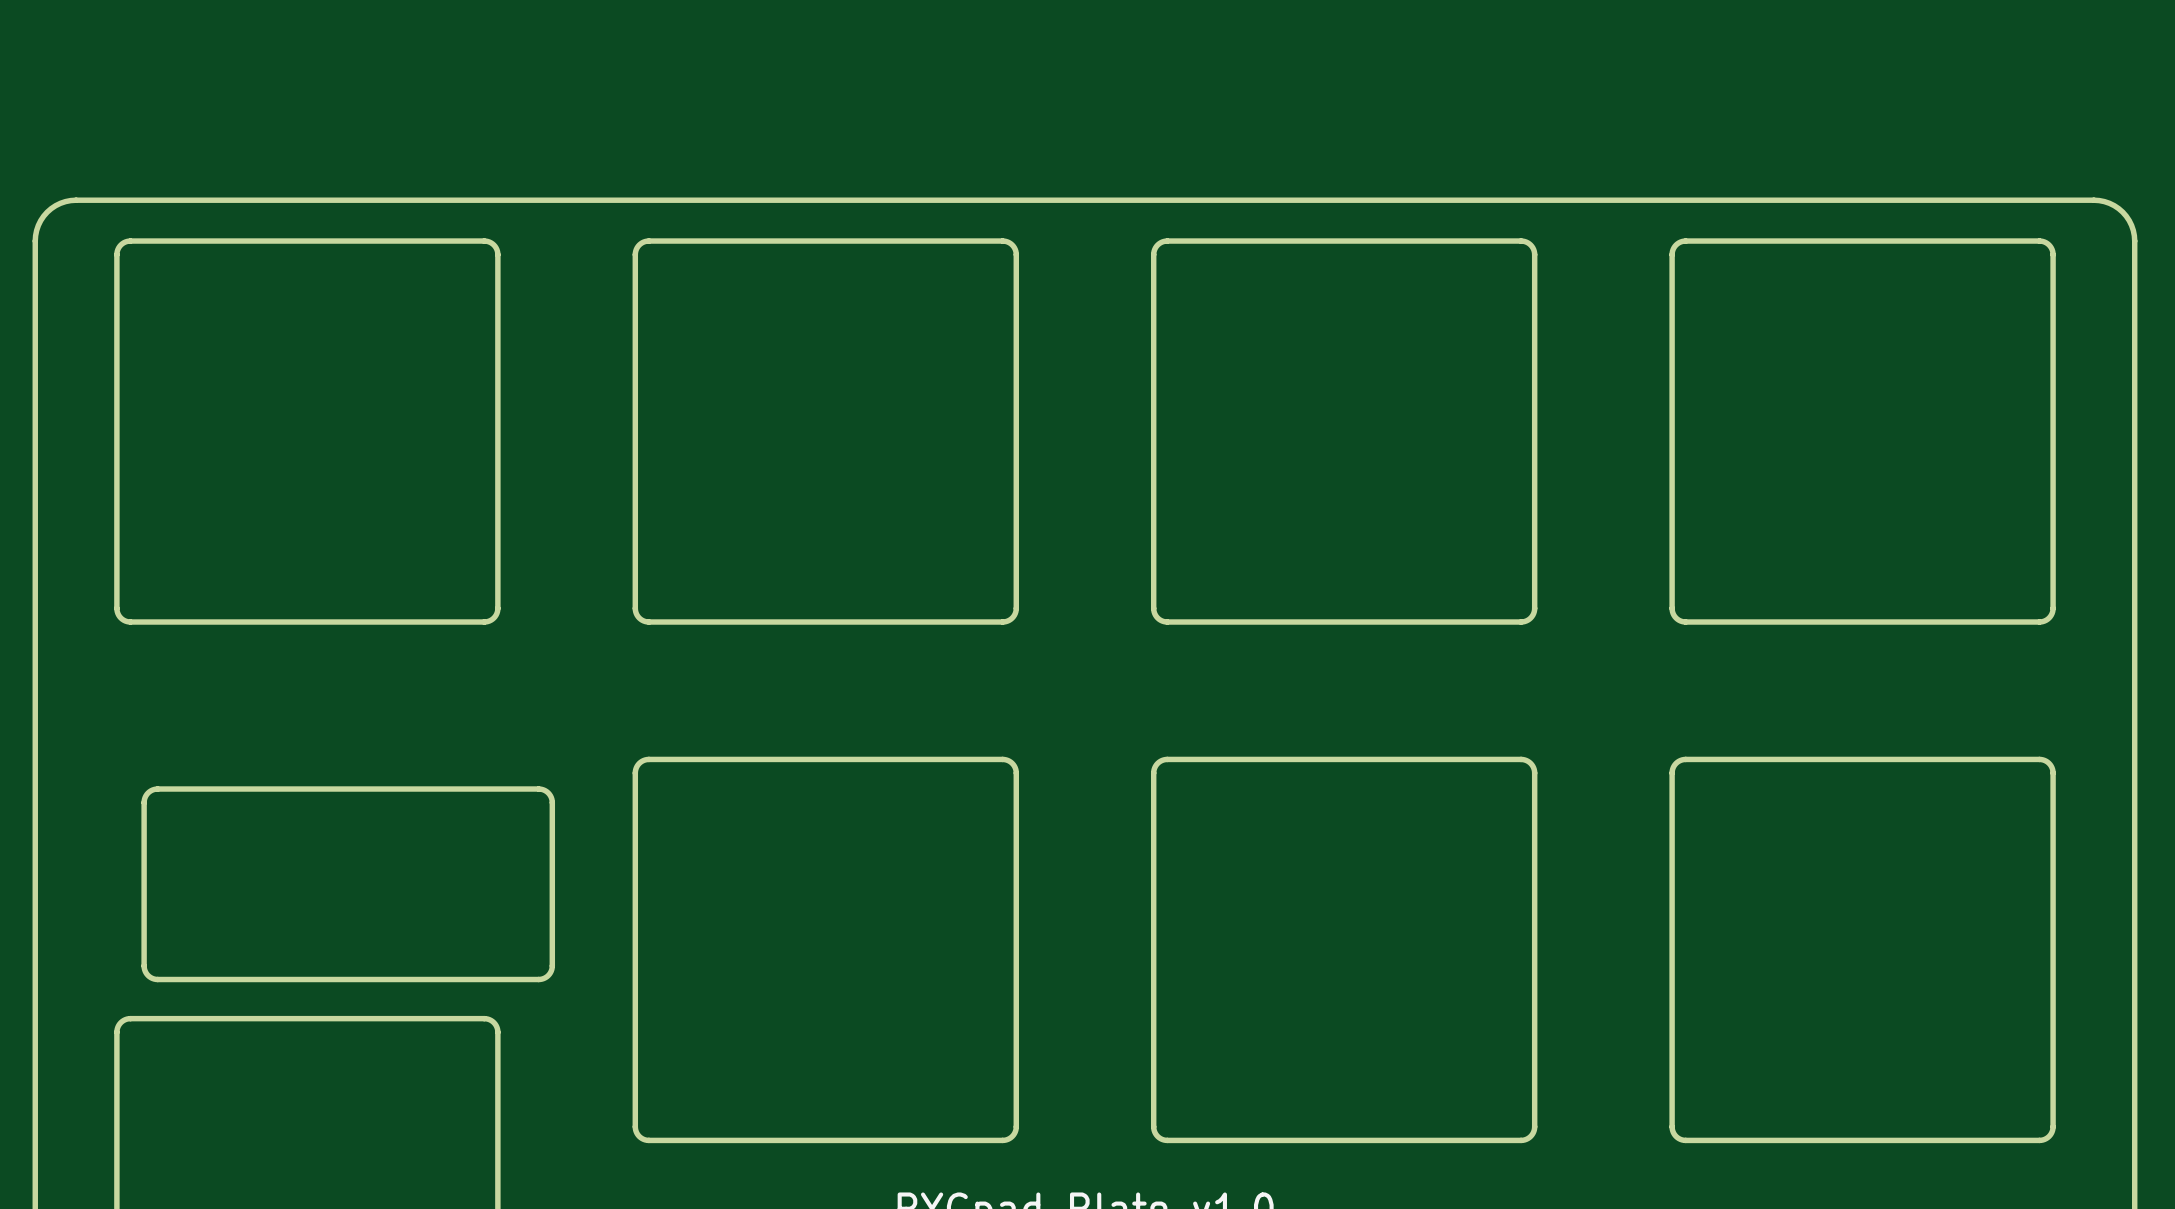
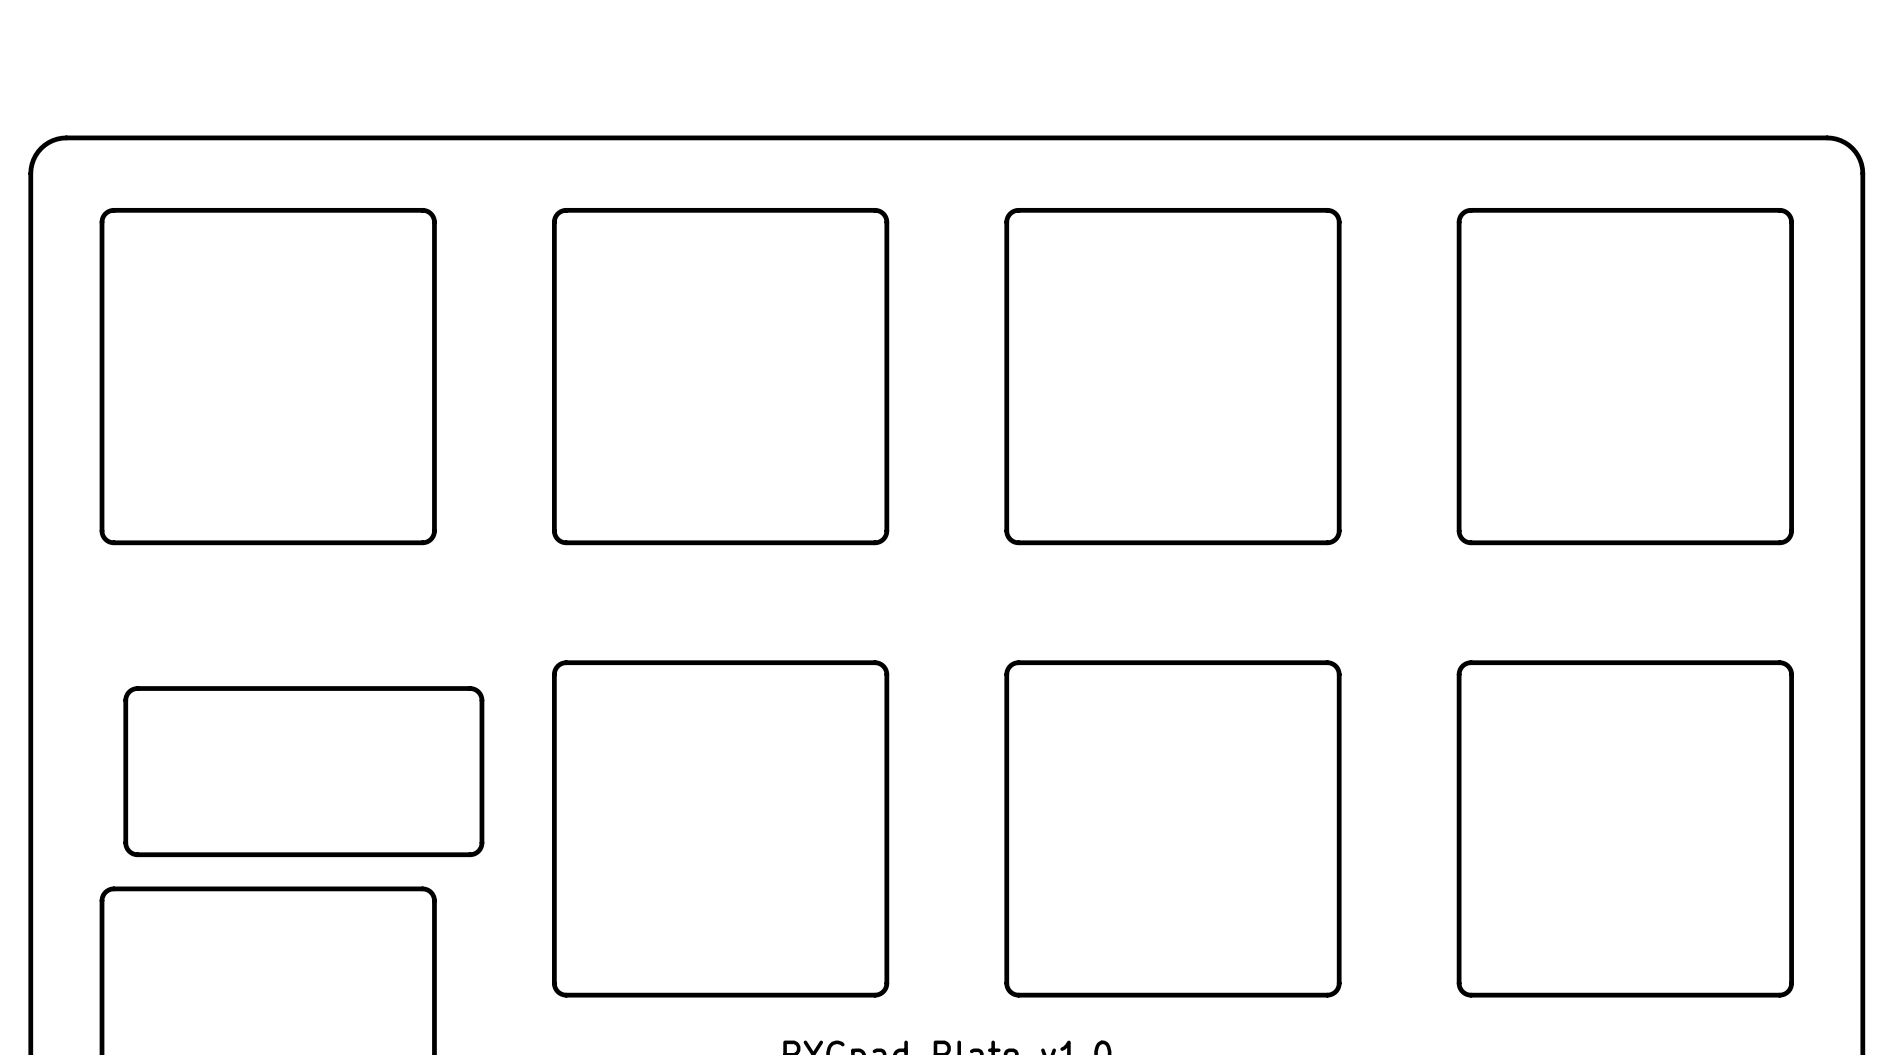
board edge: (2134, 241) (2131, 225) (2122, 212) (2109, 203) (2093, 200) (76, 200) (60, 203) (47, 212) (38, 225) (35, 241) -> (1862, 210) (1862, 173) (1860, 159) (1852, 148) (1845, 142) (1827, 137) (66, 137) (48, 142) (41, 148) (33, 159) (30, 173) (30, 210)

